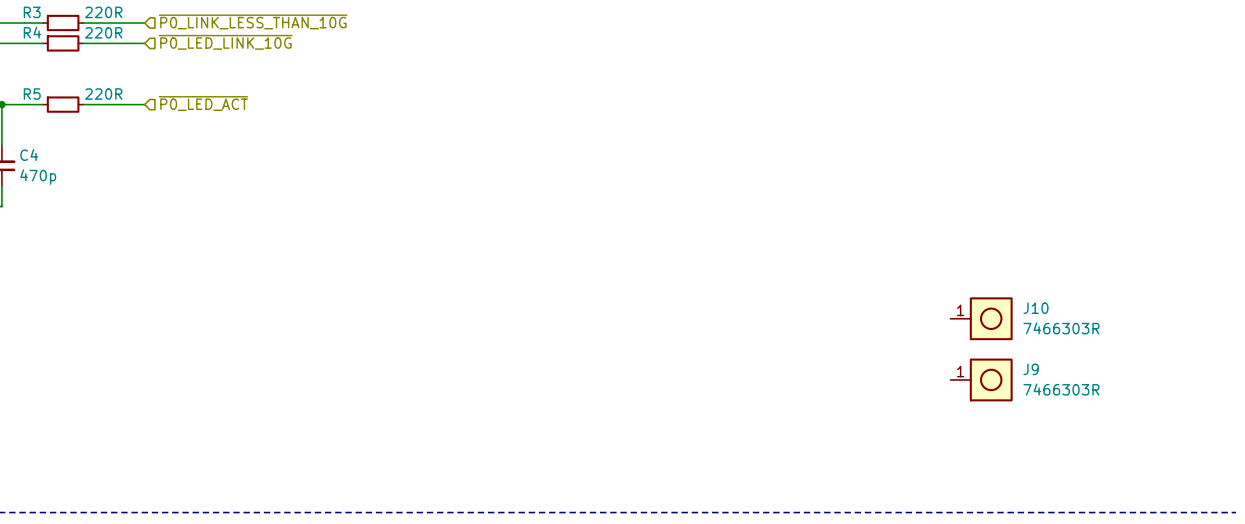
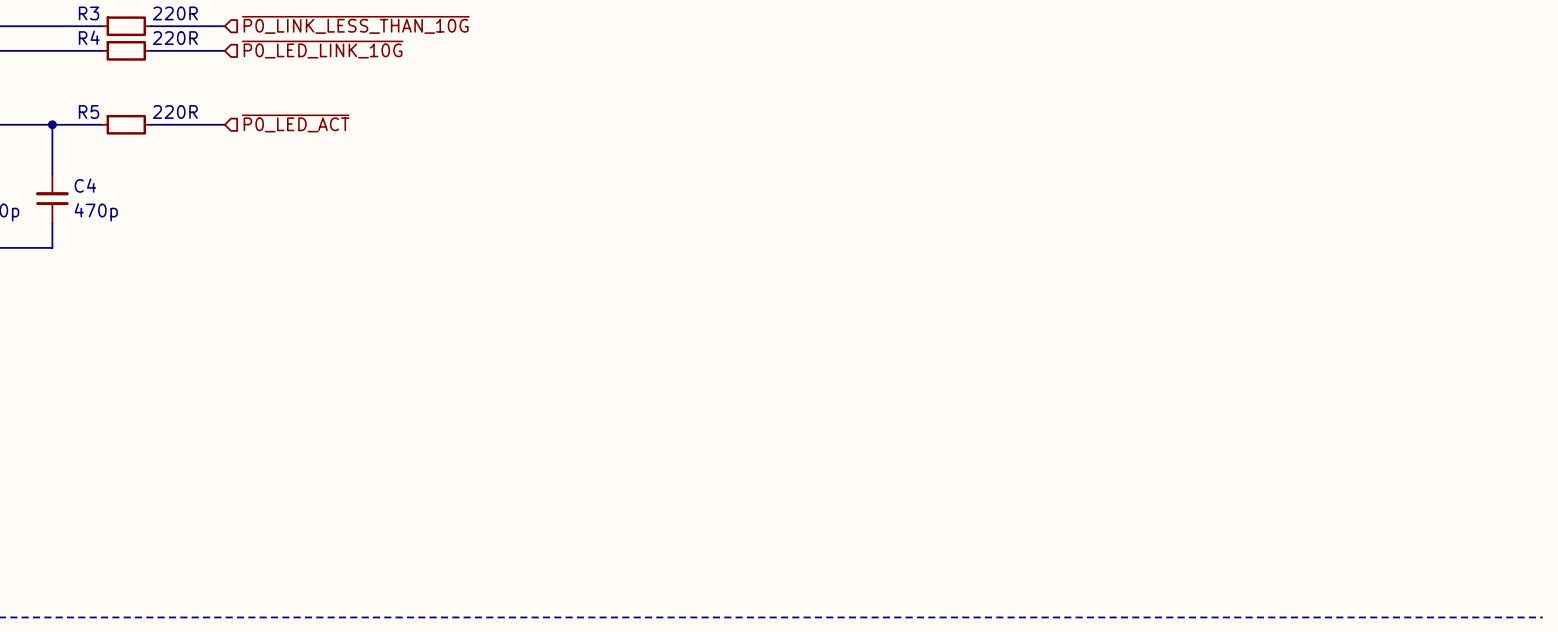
J10: (981, 318) -> none
J9: (981, 379) -> none

